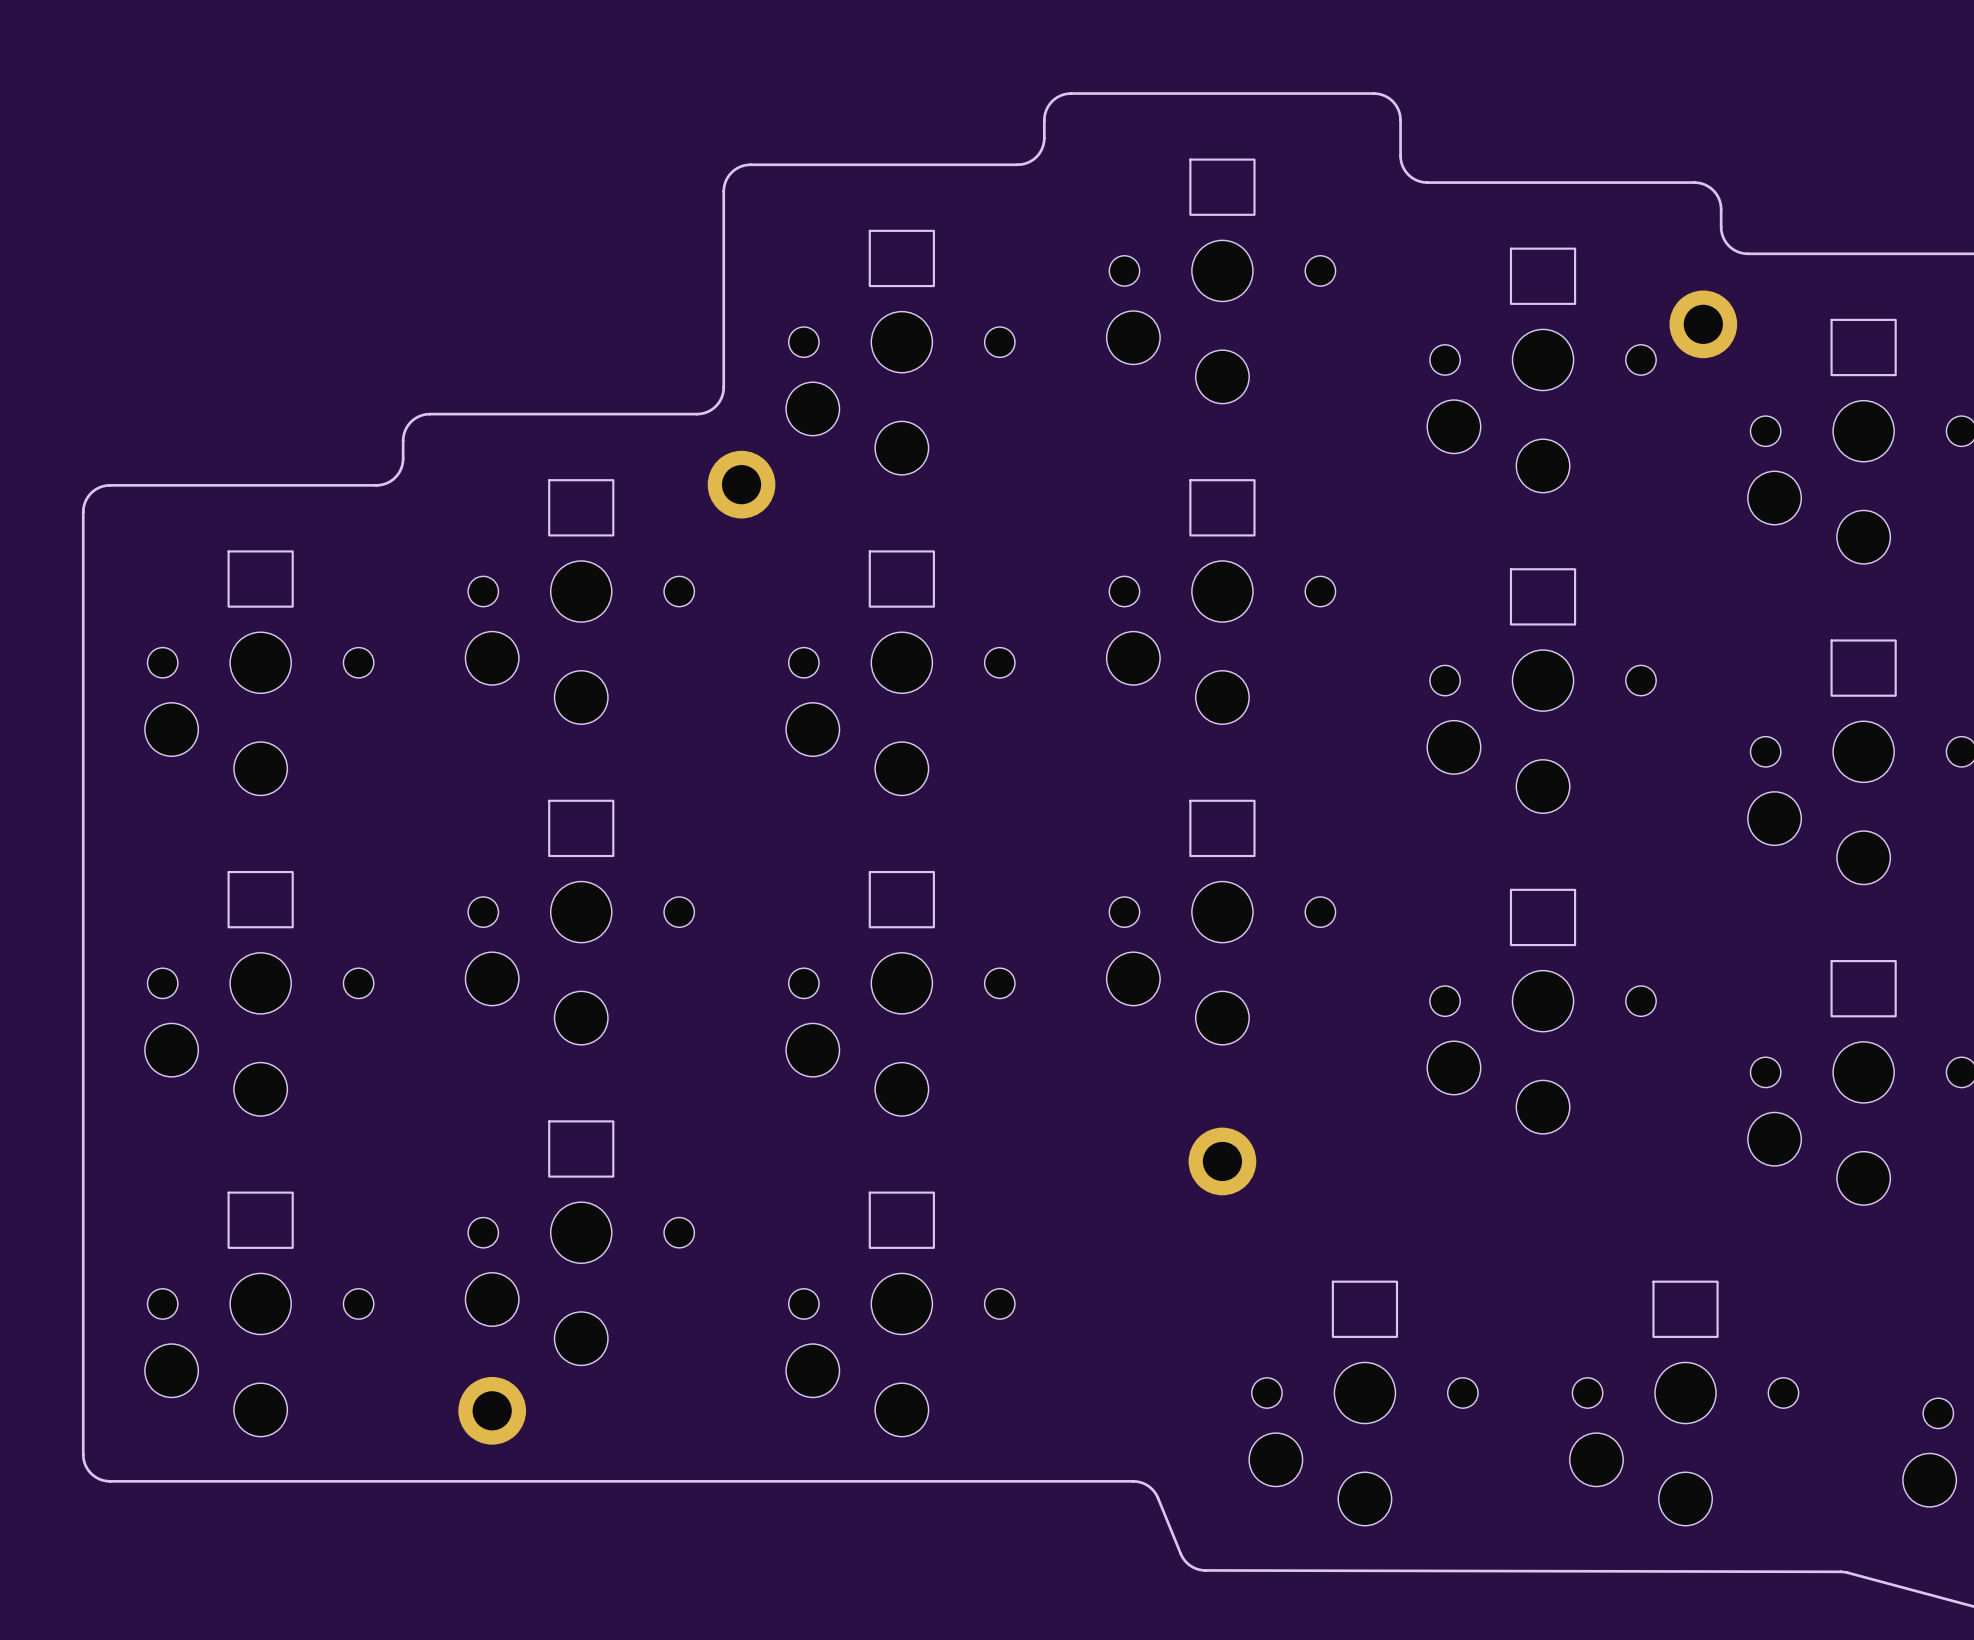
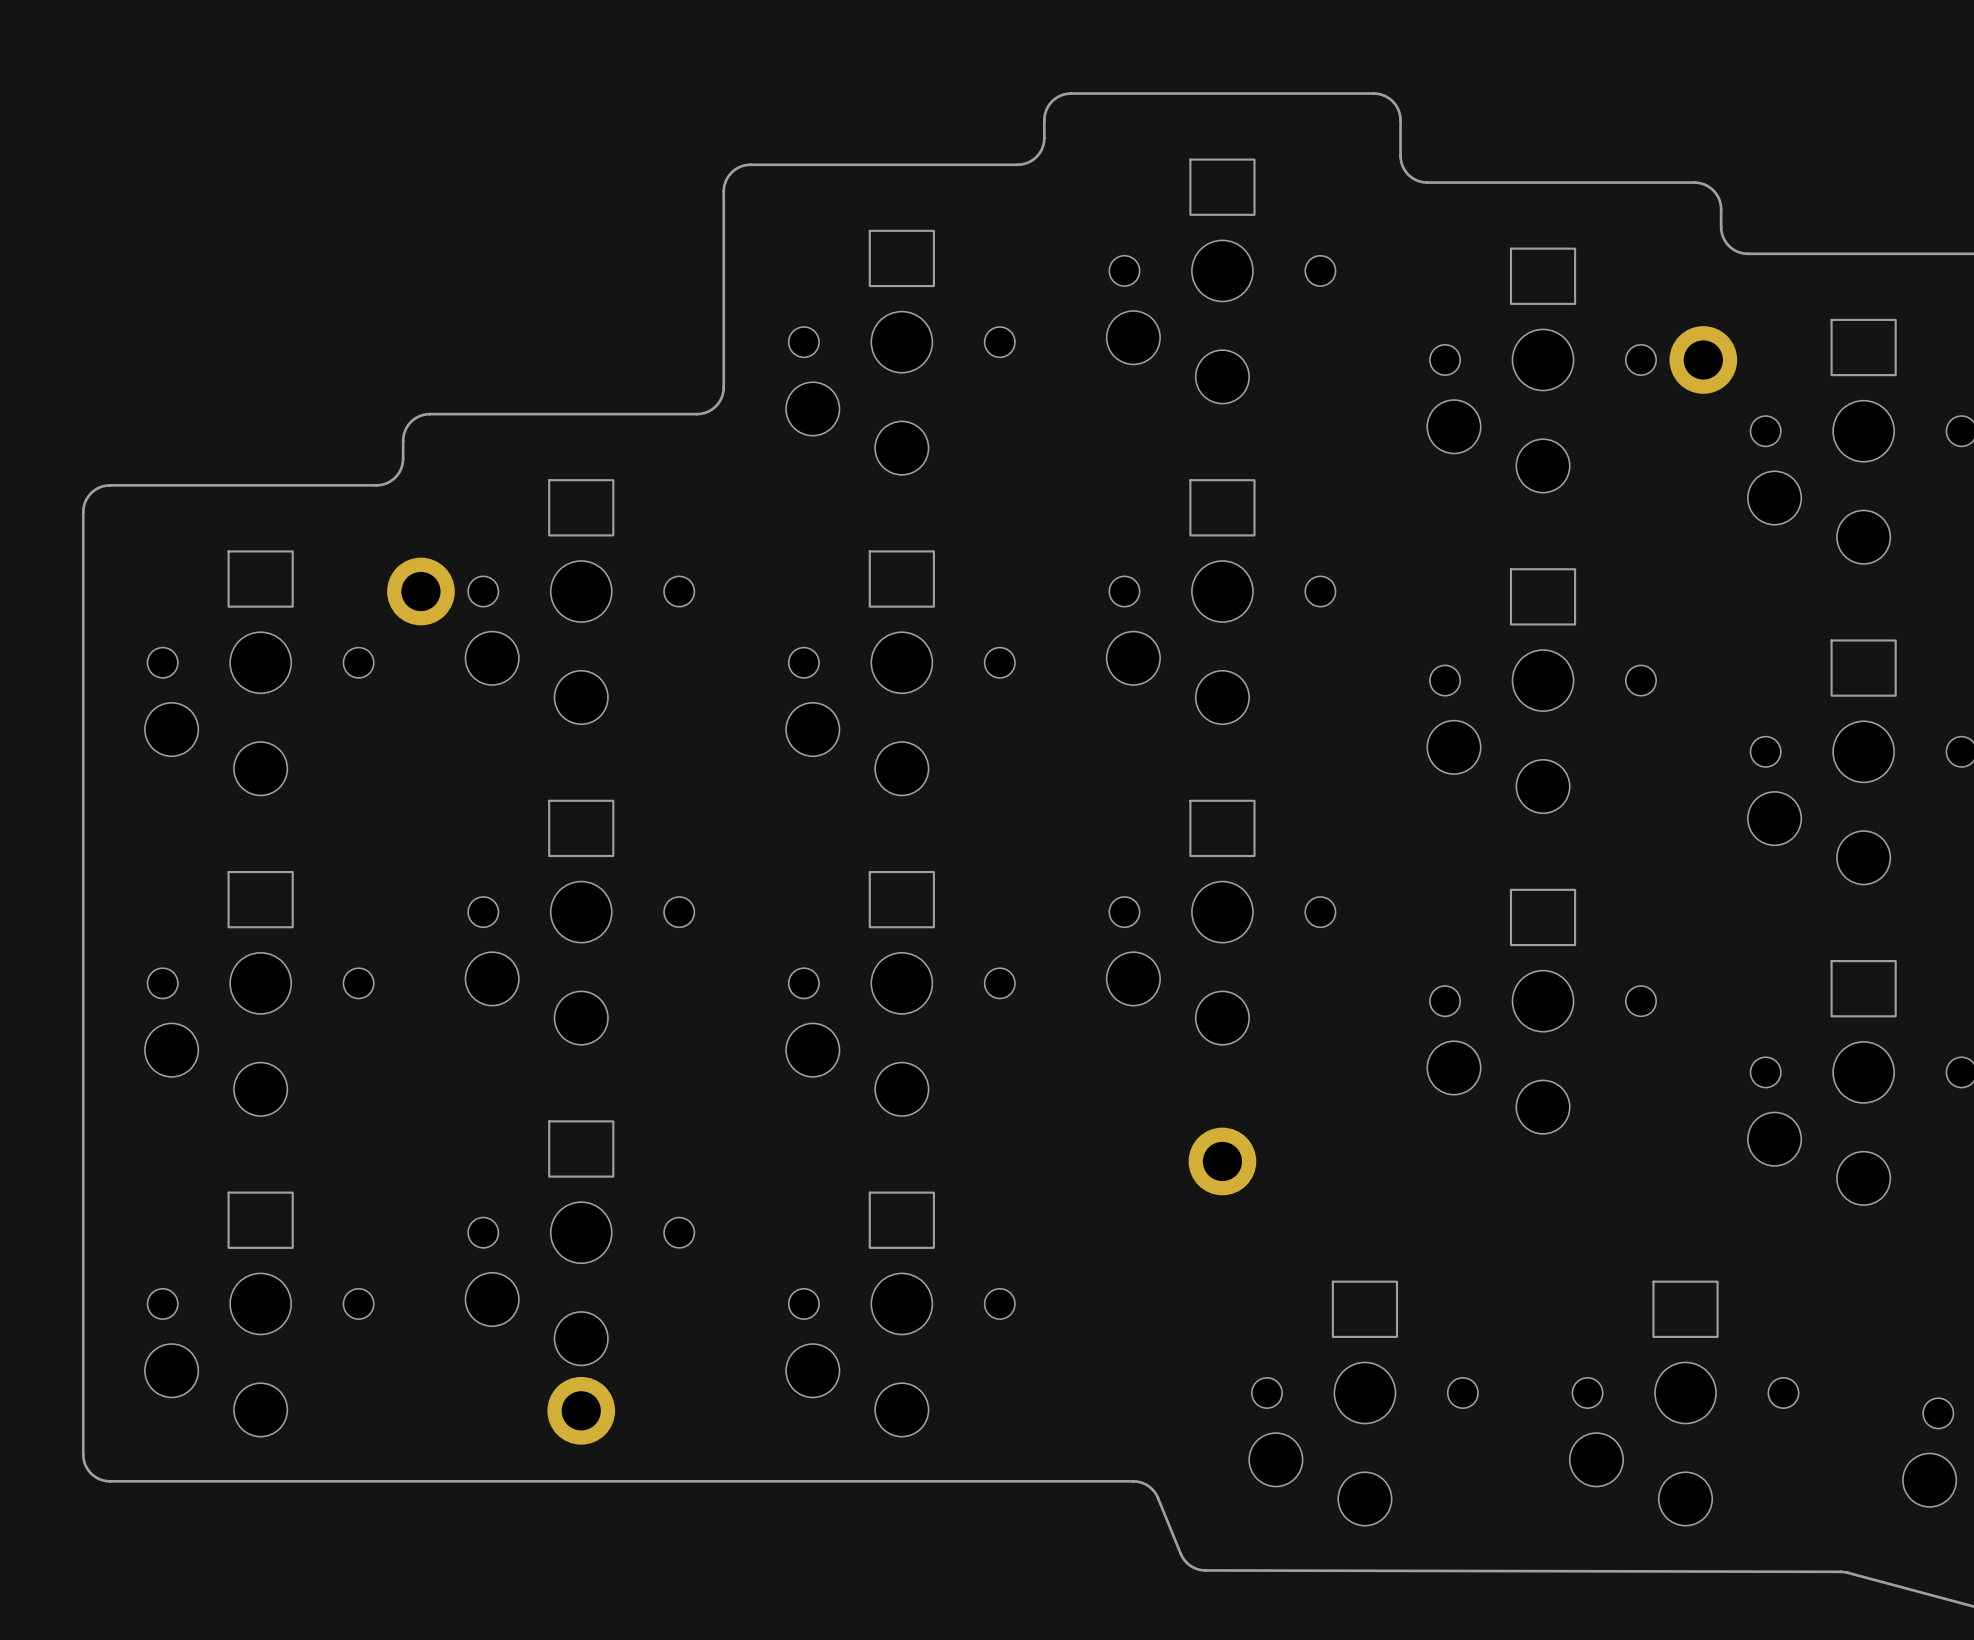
part position: (1703, 324) -> (1703, 359)
part position: (741, 484) -> (420, 591)
part position: (492, 1410) -> (581, 1410)

